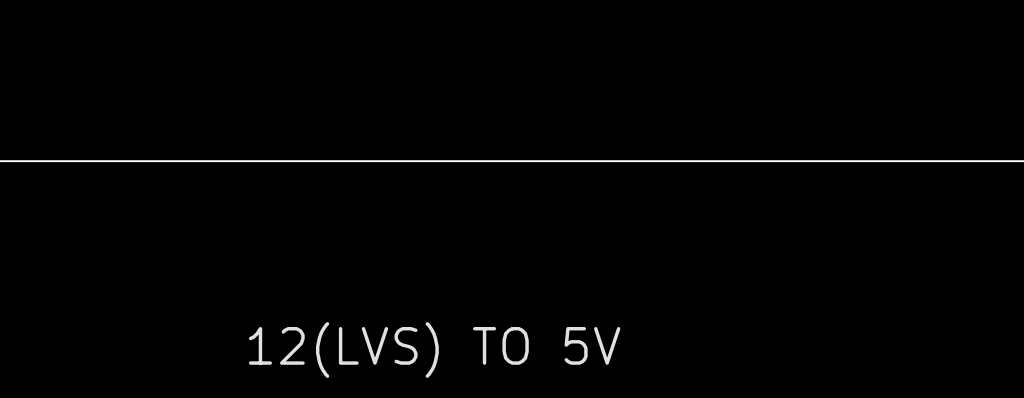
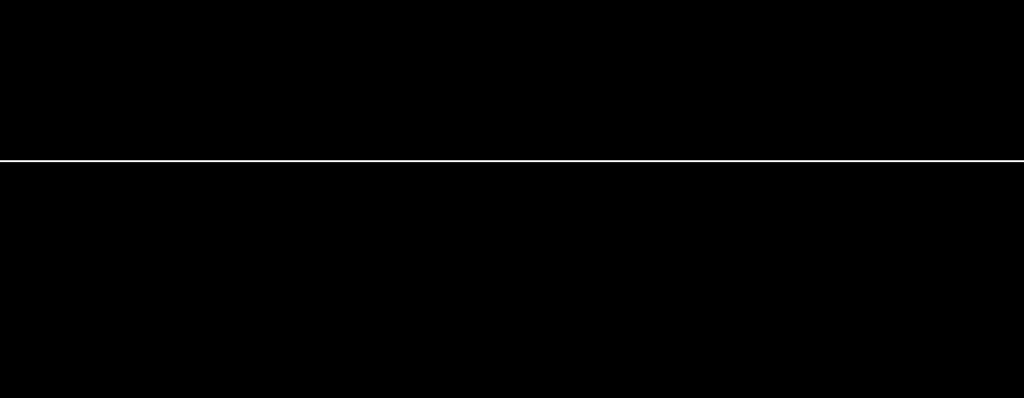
text: 12(LVS) TO 5V (434, 349) -> none

